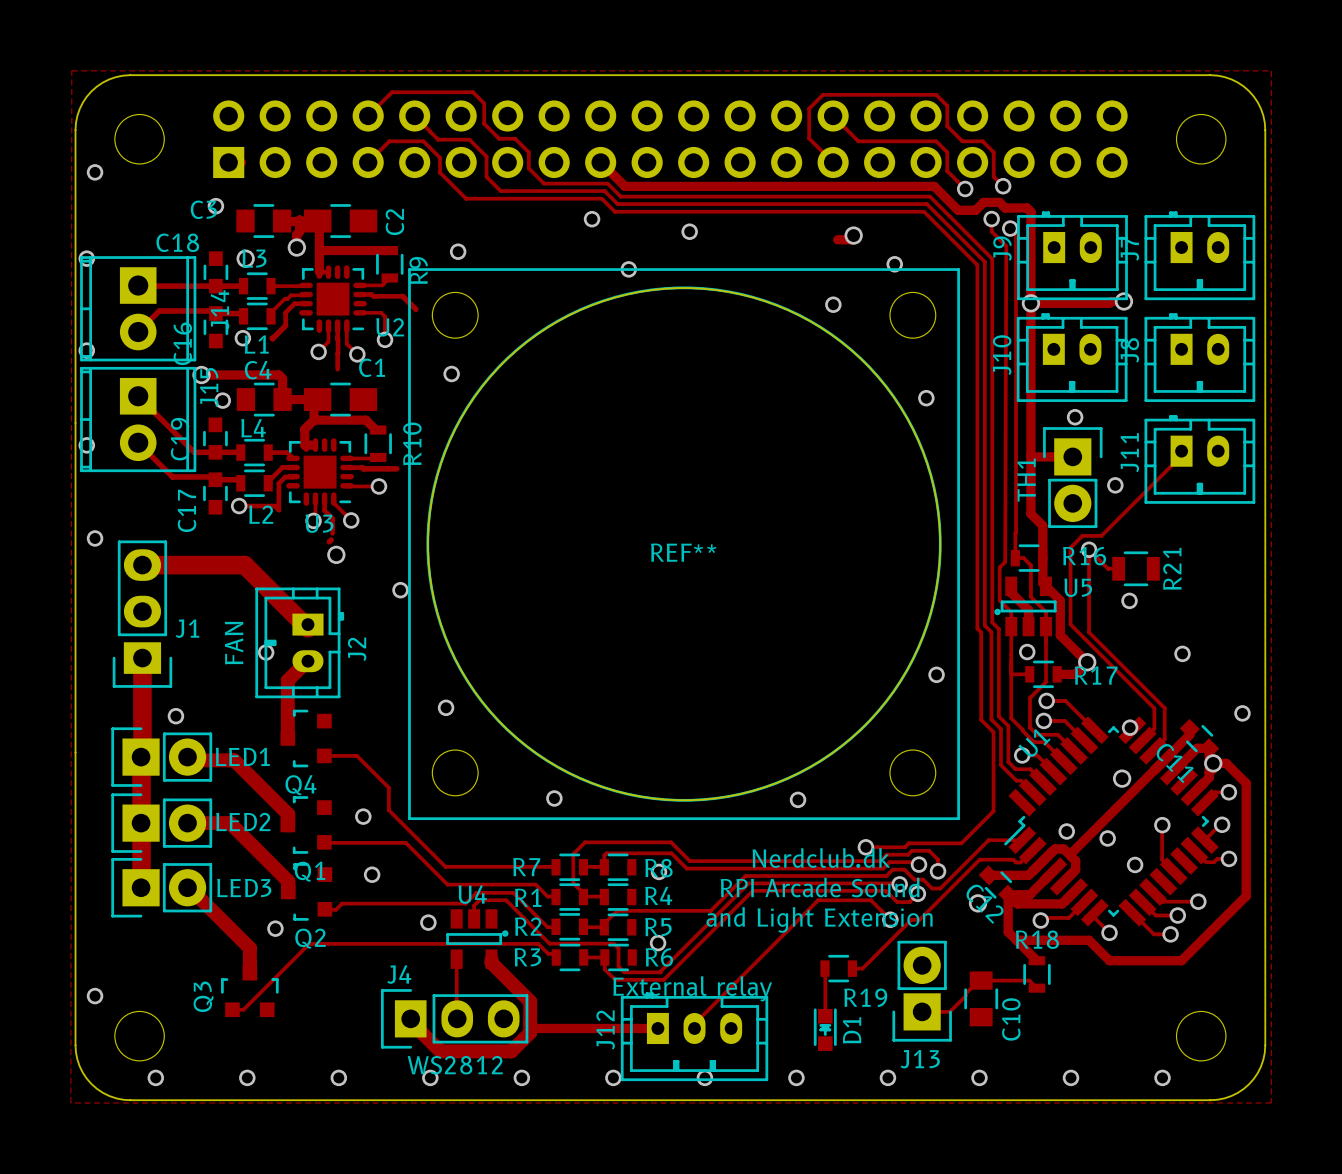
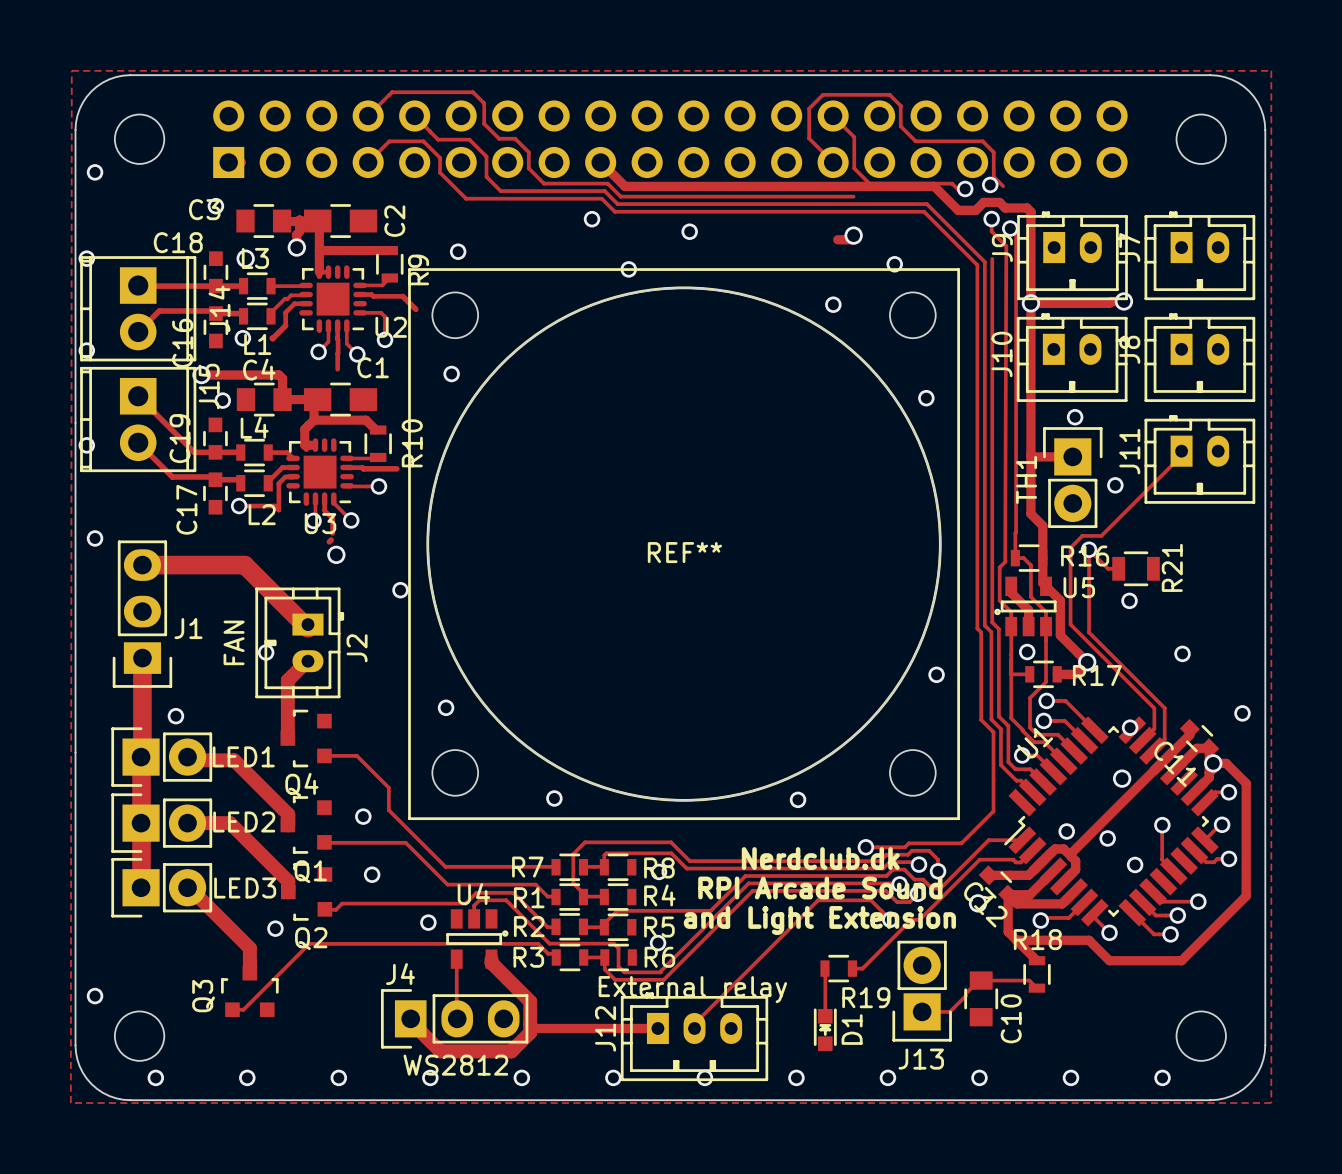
track: (889, 94) (936, 94) (947, 105) (947, 126) (962, 141) -> (889, 94) (900, 105) (900, 126) (915, 141)
track: (854, 137) (858, 141) (915, 141) -> (854, 137) (854, 168) (869, 183) (952, 183) (958, 190) (970, 190)
track: (936, 141) (947, 152) (947, 171) (965, 188) -> (936, 141) (962, 141)
via position: (1003, 186) -> (990, 184)
track: (853, 196) (930, 196) (992, 258) -> none

